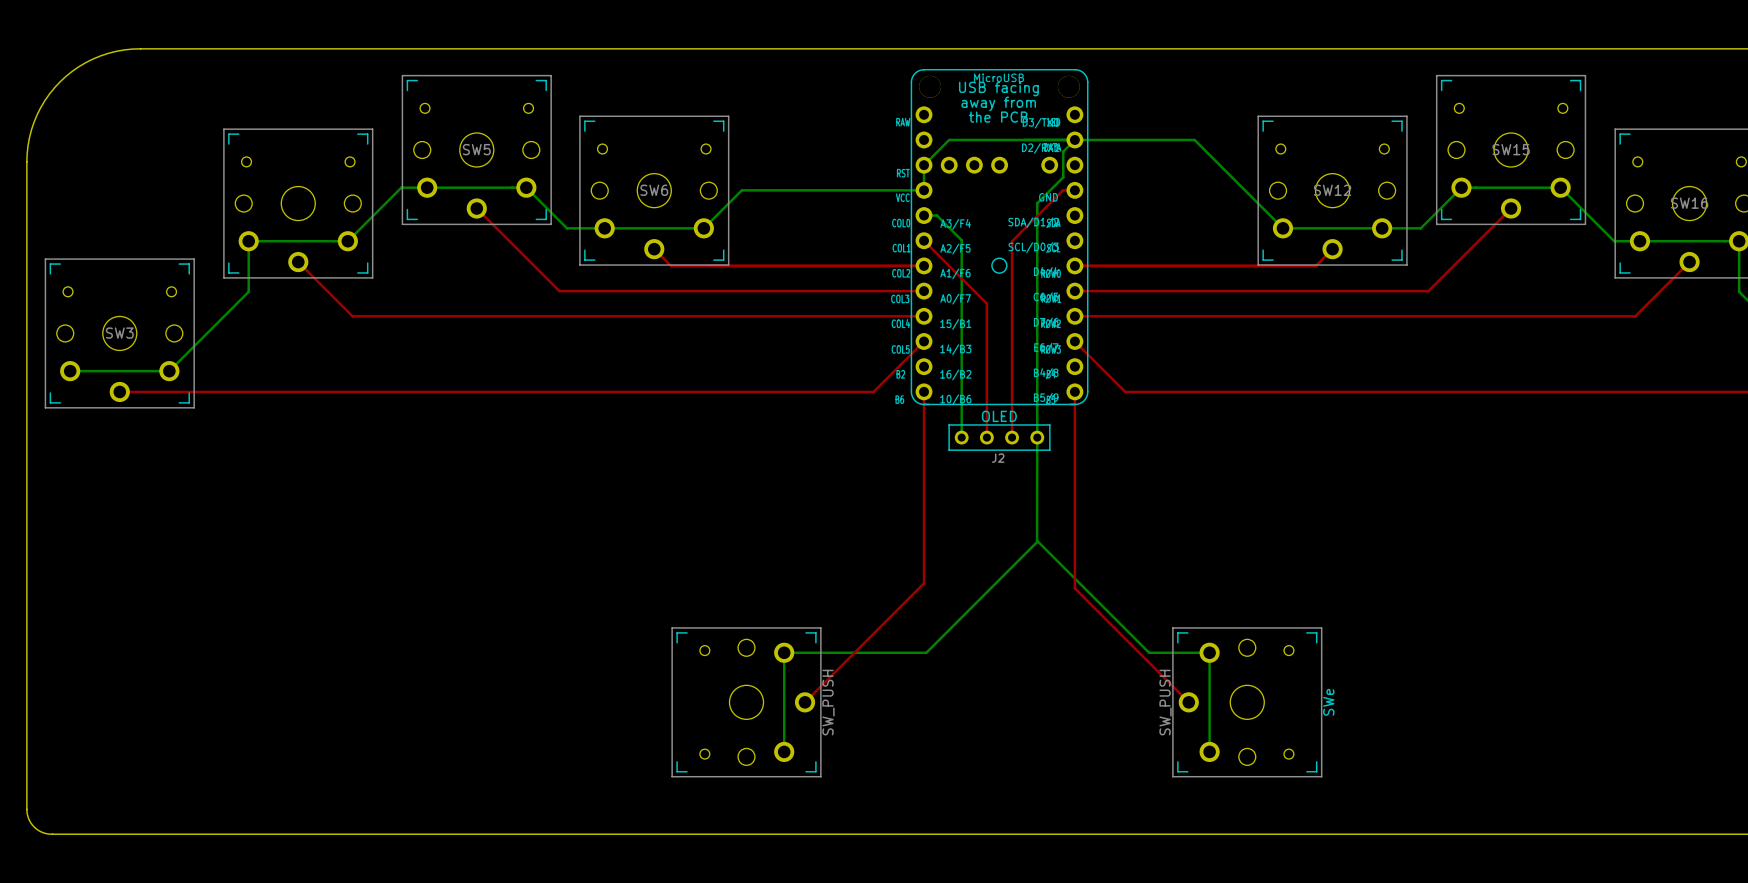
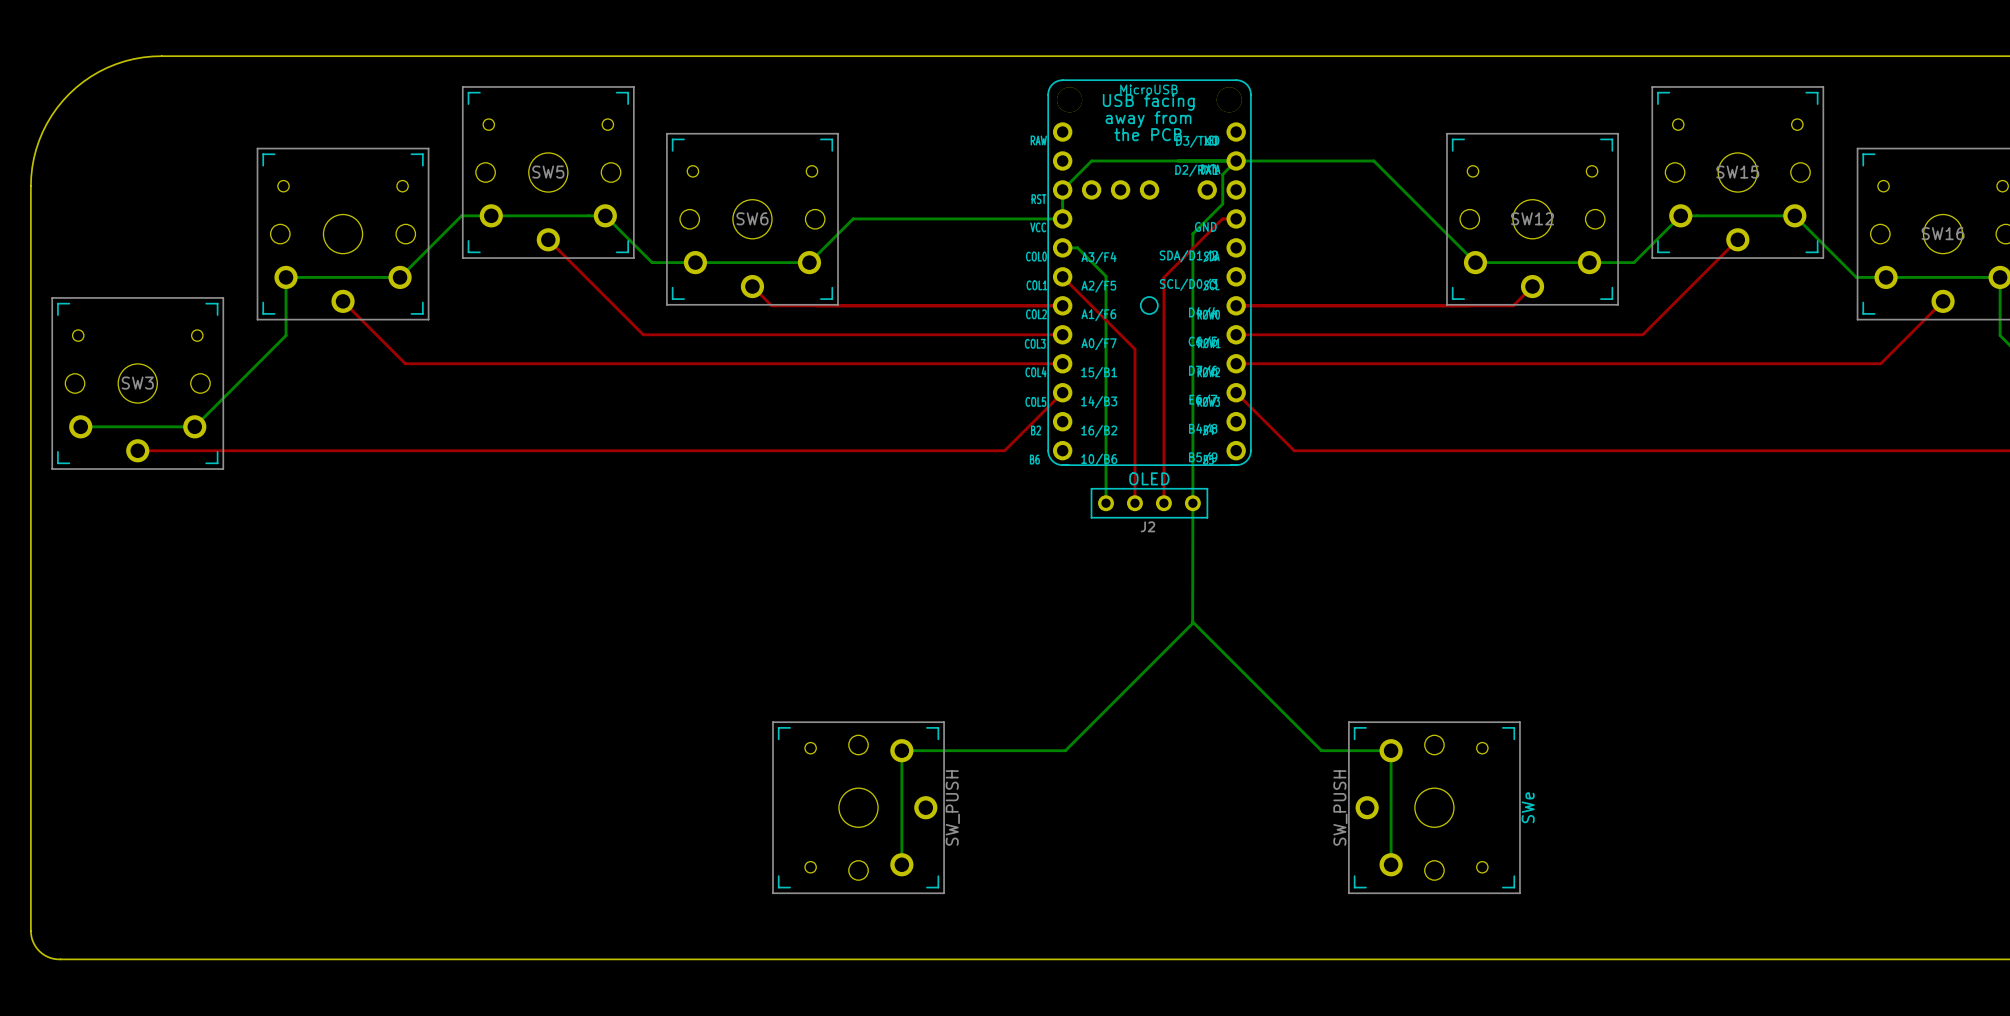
top track: (924, 391) (924, 583) (805, 702) -> none
top track: (1074, 391) (1074, 588) (1188, 702) -> none

